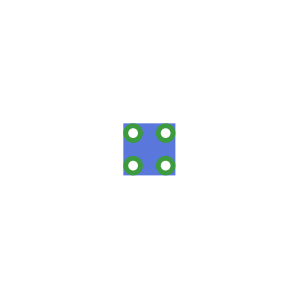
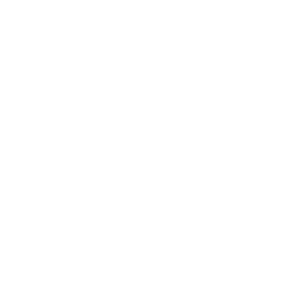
part: (149, 149) -> none

